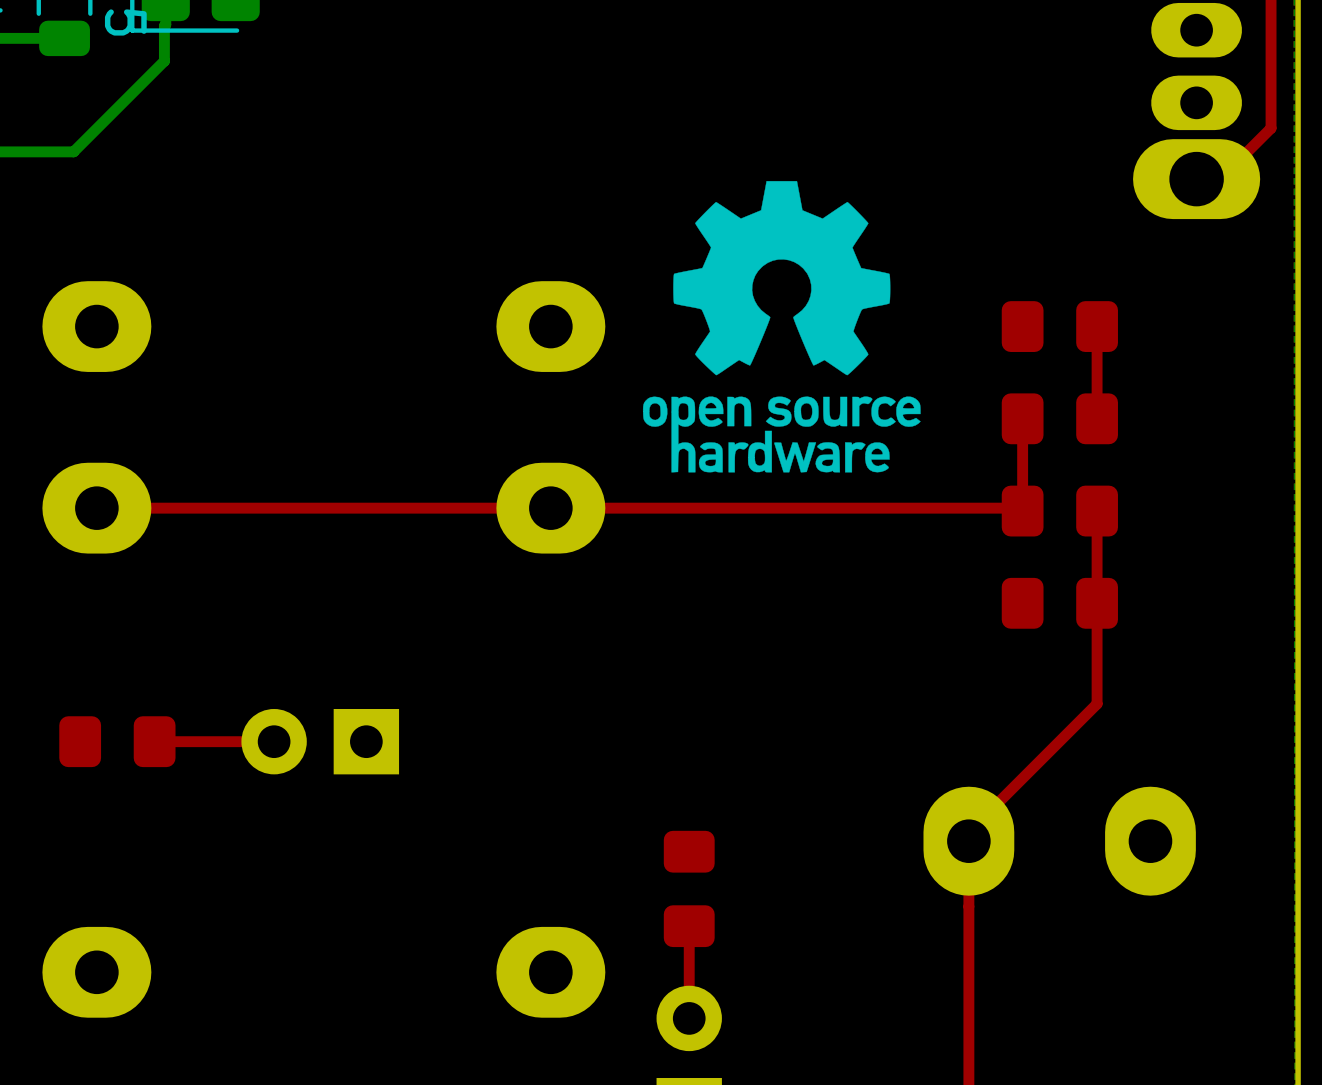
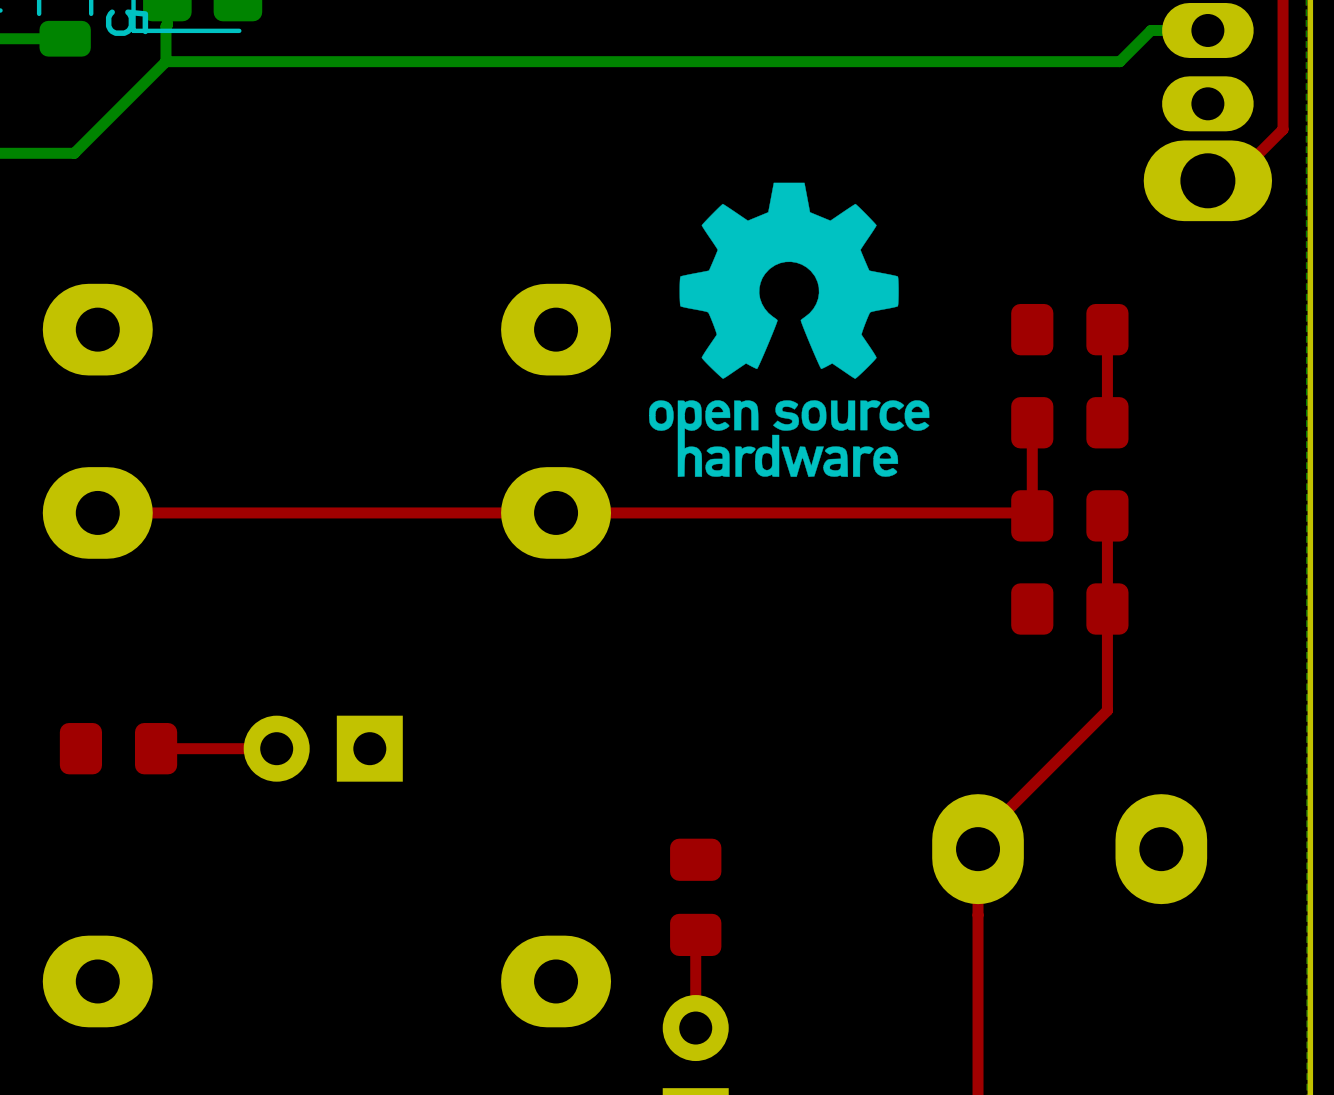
bottom track: none -> (1207, 30) (1151, 30) (1119, 61) (165, 61)

